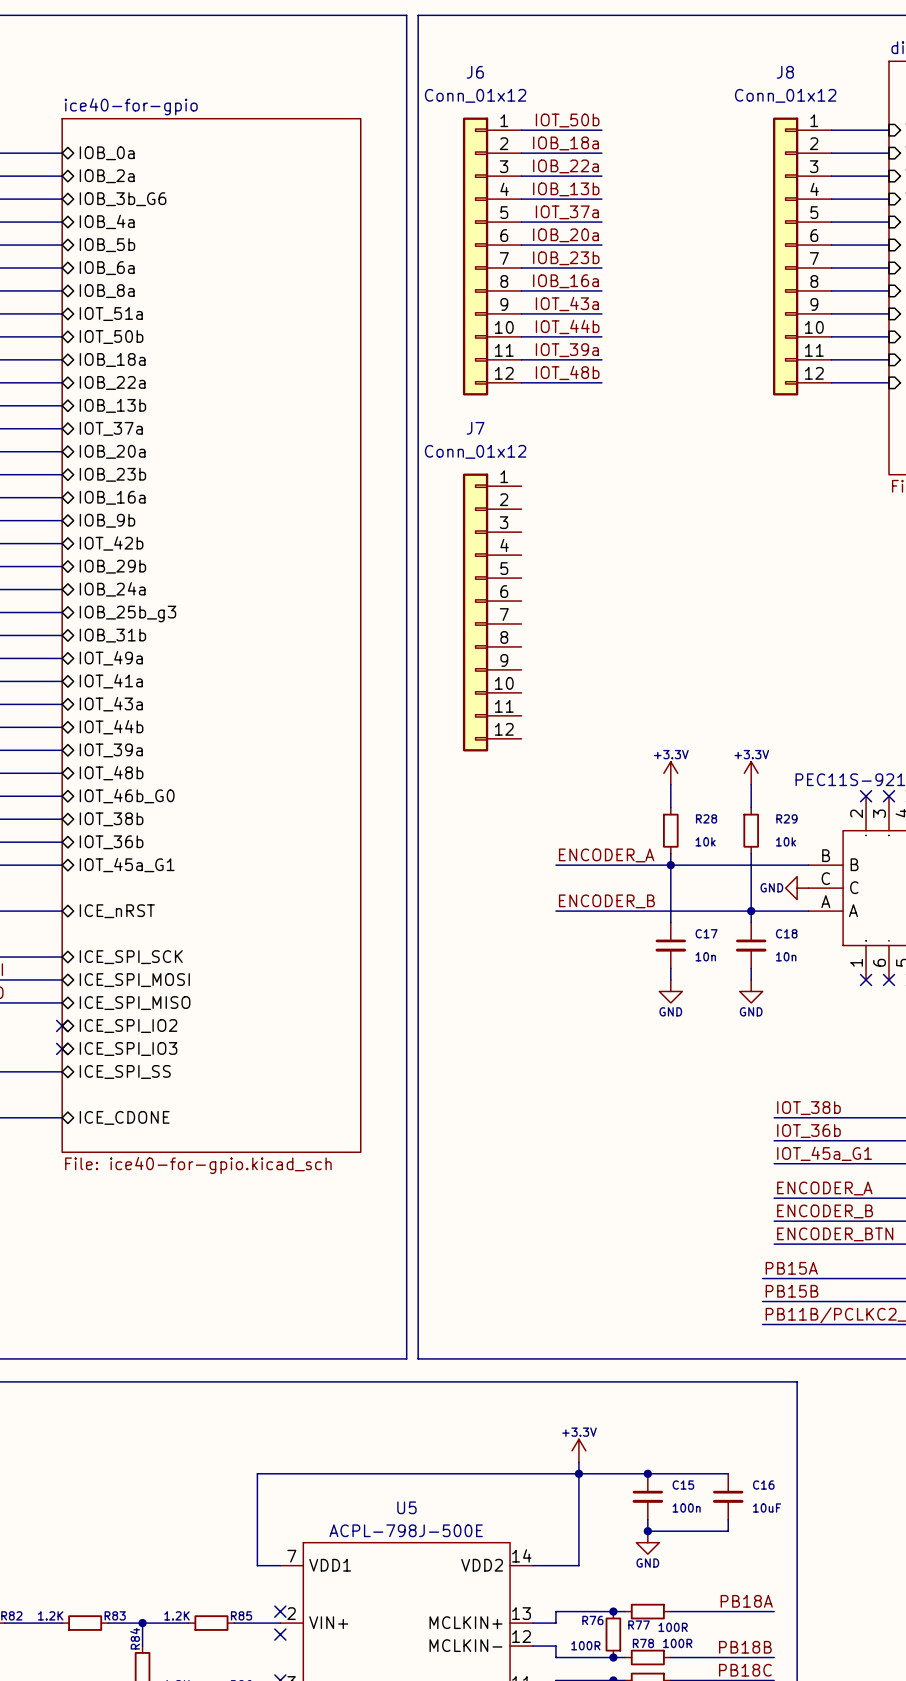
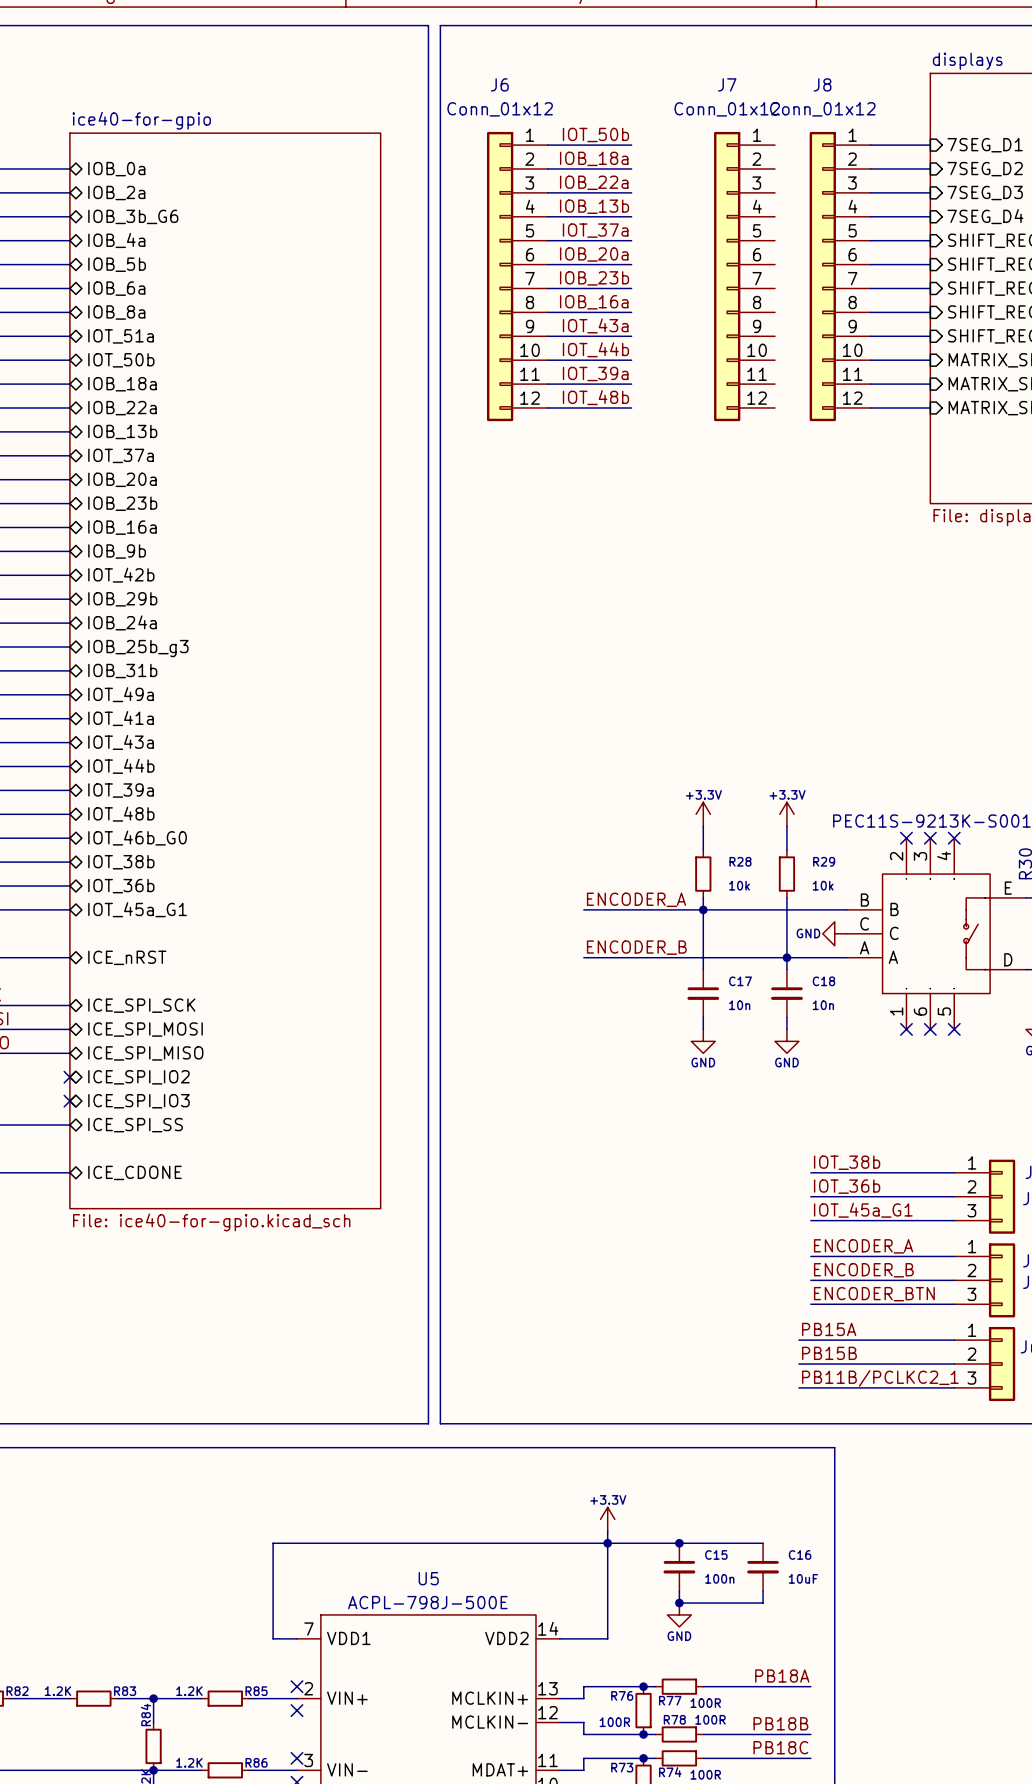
J7 position: (492, 612) -> (744, 276)

